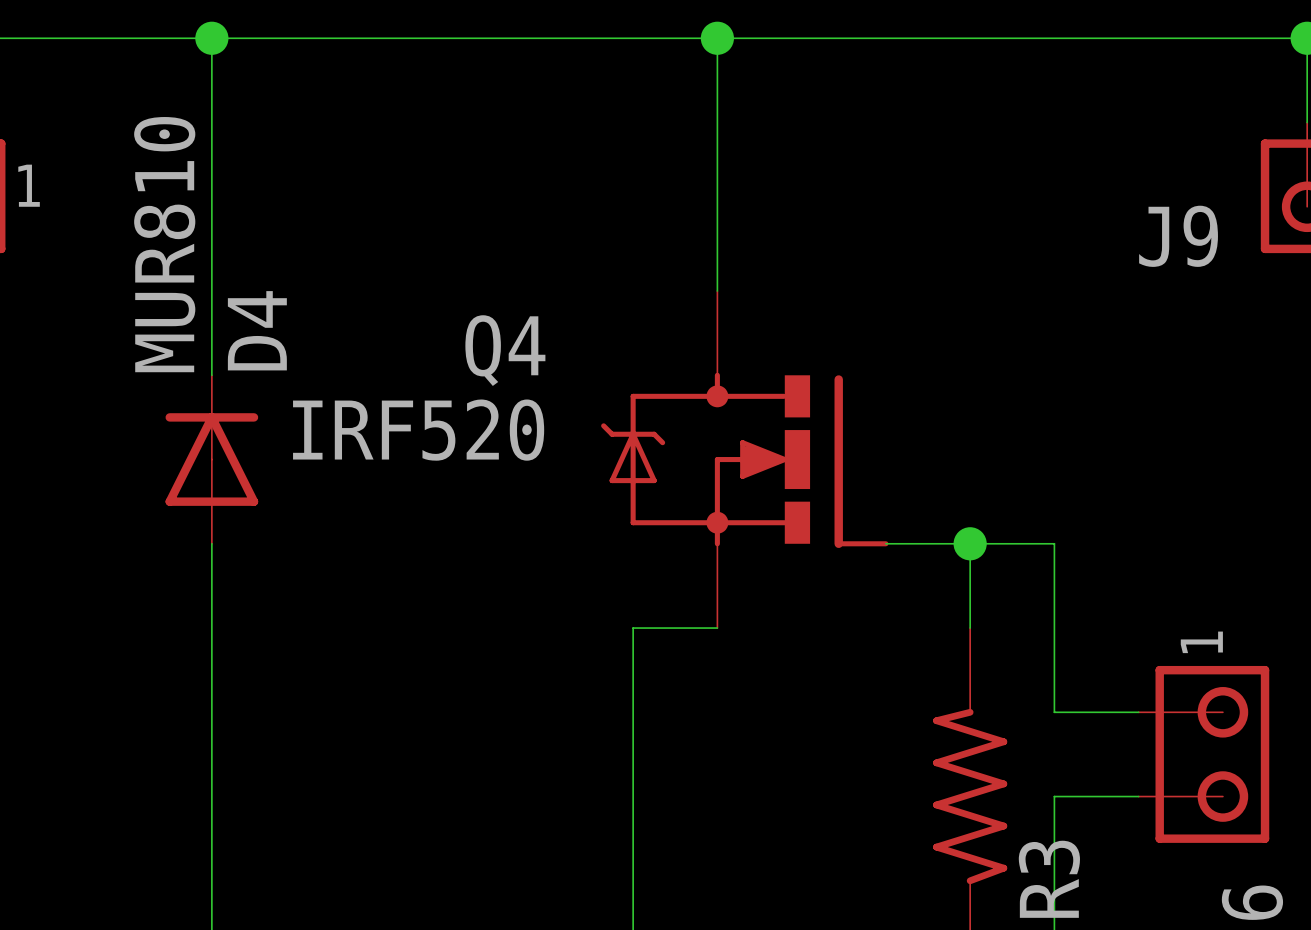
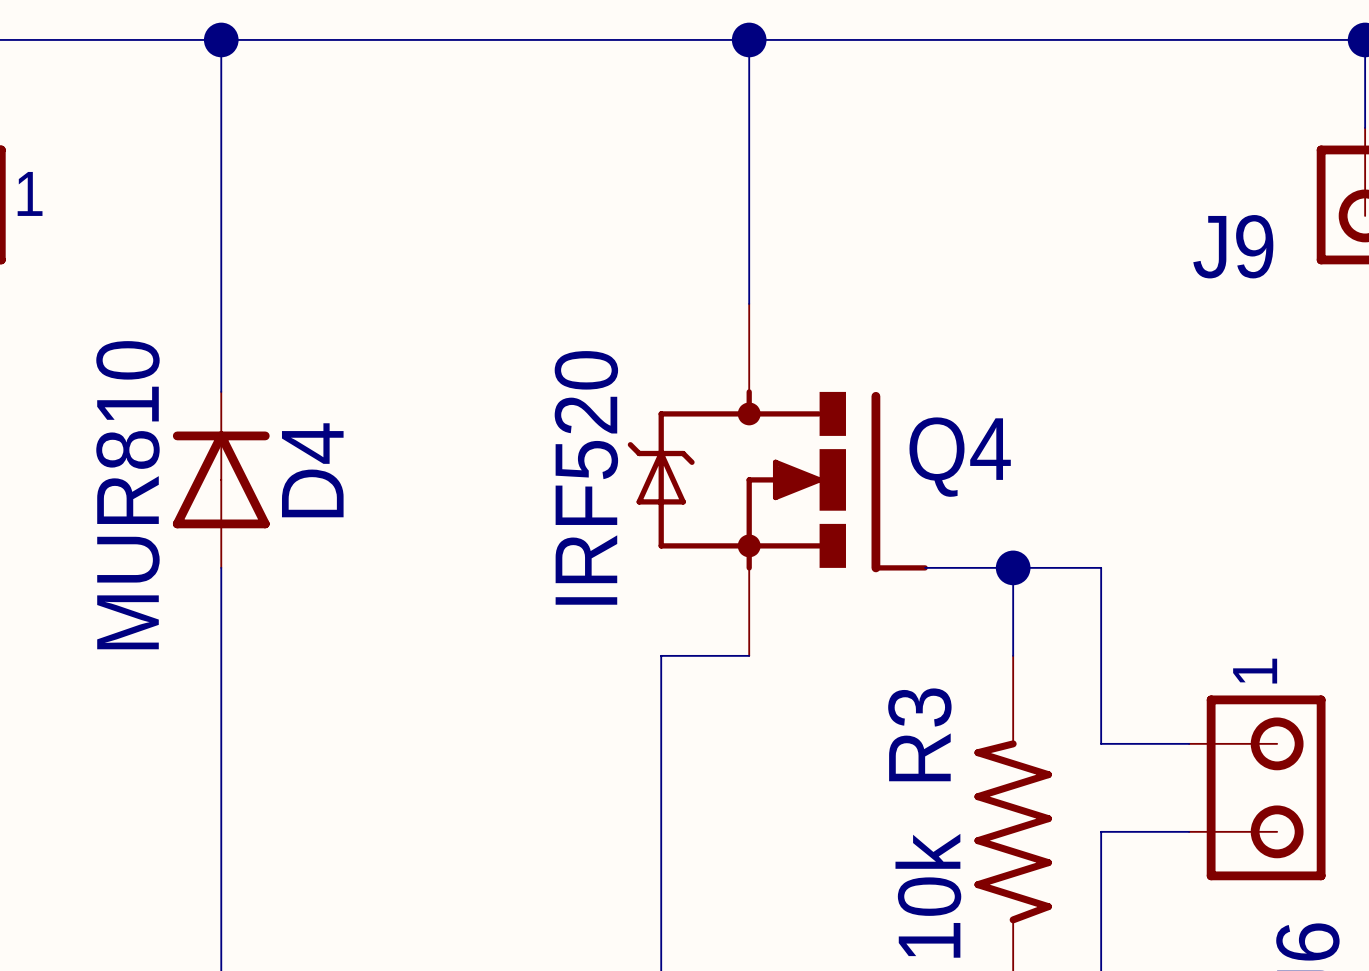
D4 value position: MUR810 (164, 244) -> MUR810 (127, 495)
D4 name position: D4 (257, 330) -> D4 (312, 470)
Q4 name position: Q4 (505, 350) -> Q4 (960, 457)
Q4 value rotation: 0° (418, 430) -> 90° counterclockwise (586, 477)
R3 value: none -> 10k (928, 895)
R3 name position: R3 (1049, 879) -> R3 (919, 734)

